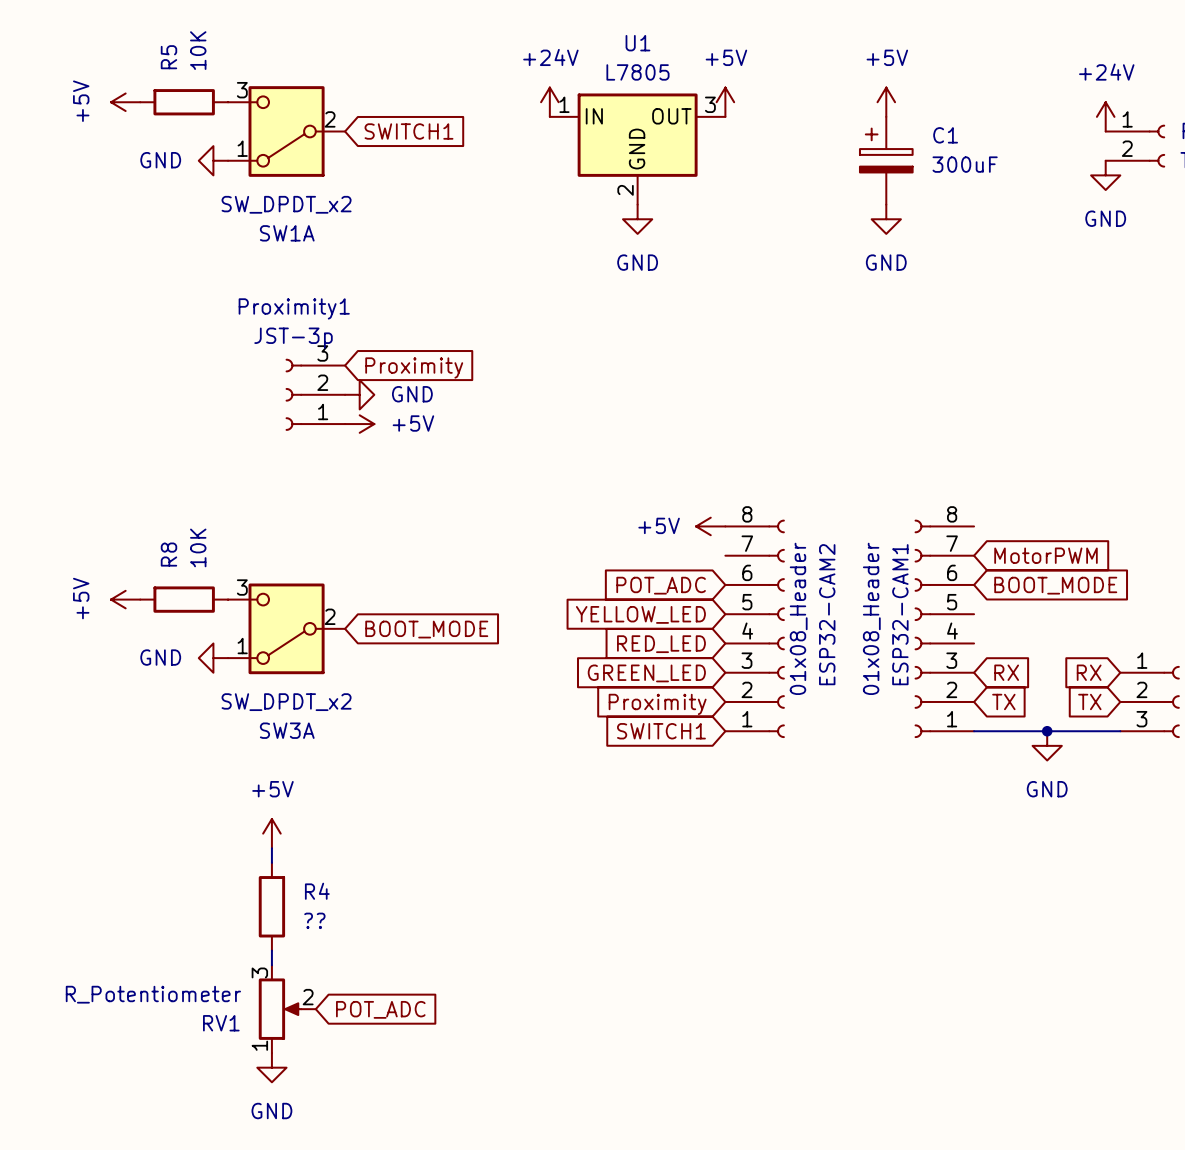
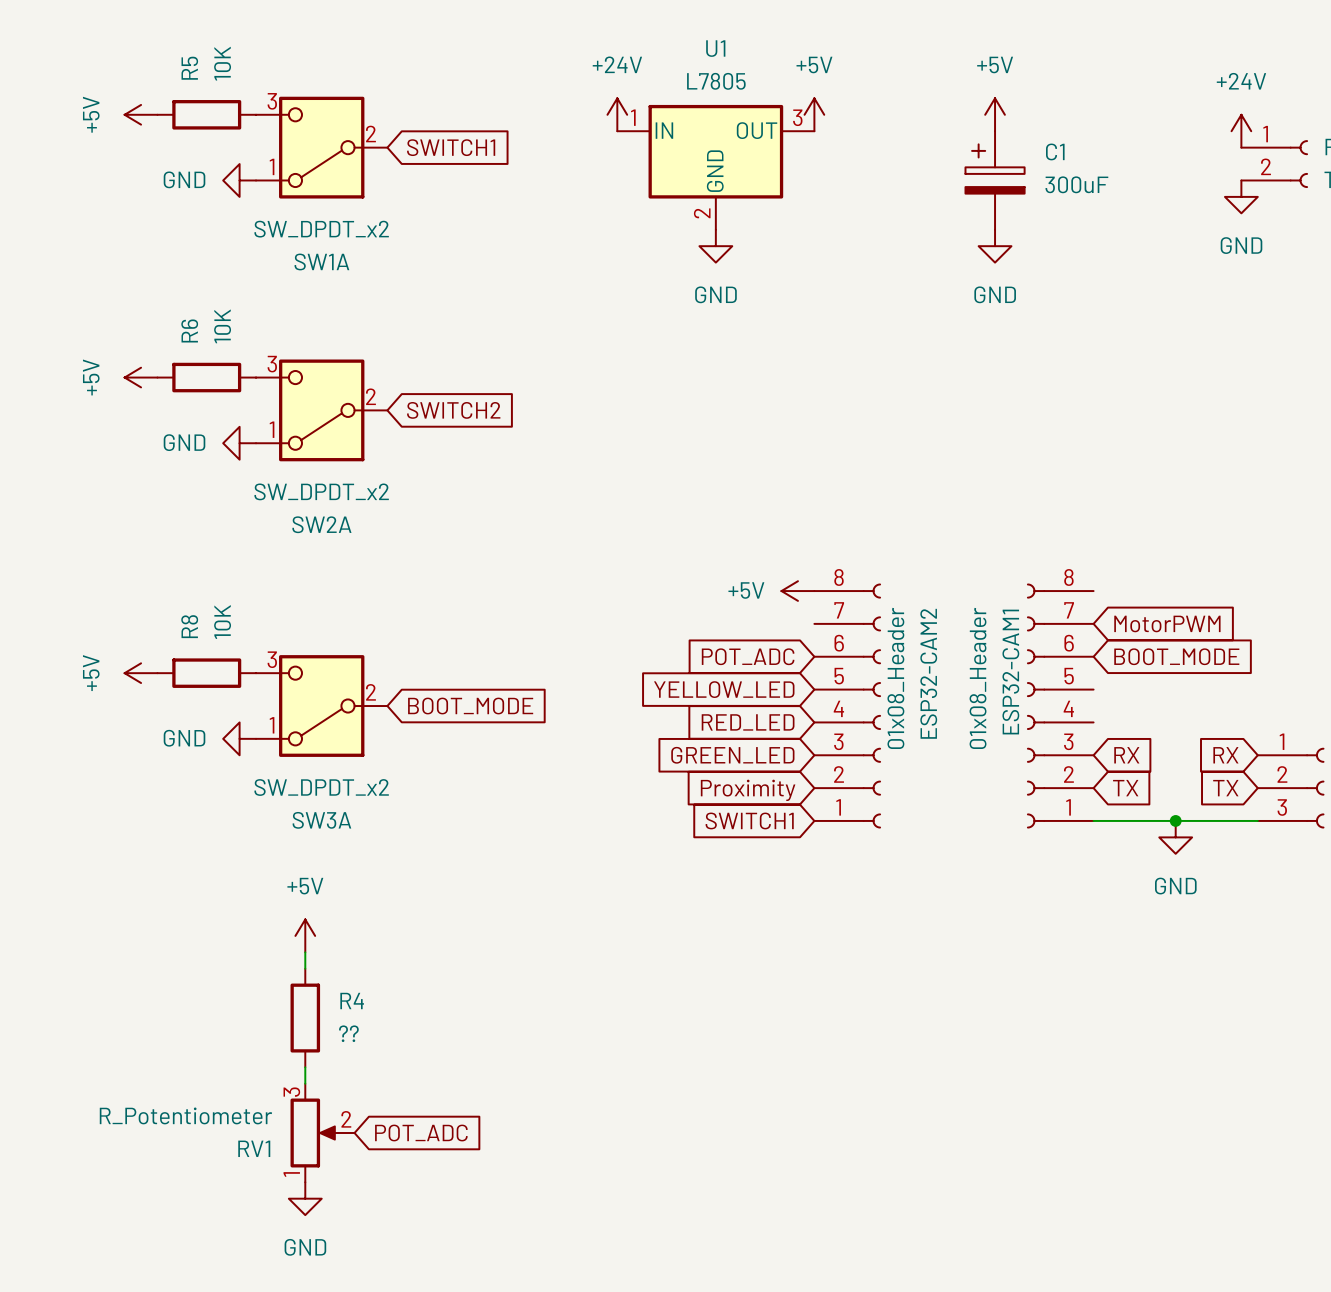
R6: none -> 10K (206, 377)
SW2A: none -> SW_DPDT_x2 (321, 410)
global label: Proximity (414, 367) -> SWITCH2 (453, 410)
Proximity1: JST-3p (315, 394) -> none
power symbol rotation: 0° (359, 394) -> 180° (239, 443)
power symbol position: GND (359, 394) -> GND (239, 443)
power symbol rotation: 0° (359, 424) -> 180° (141, 377)
power symbol position: +5V (359, 424) -> +5V (141, 377)

